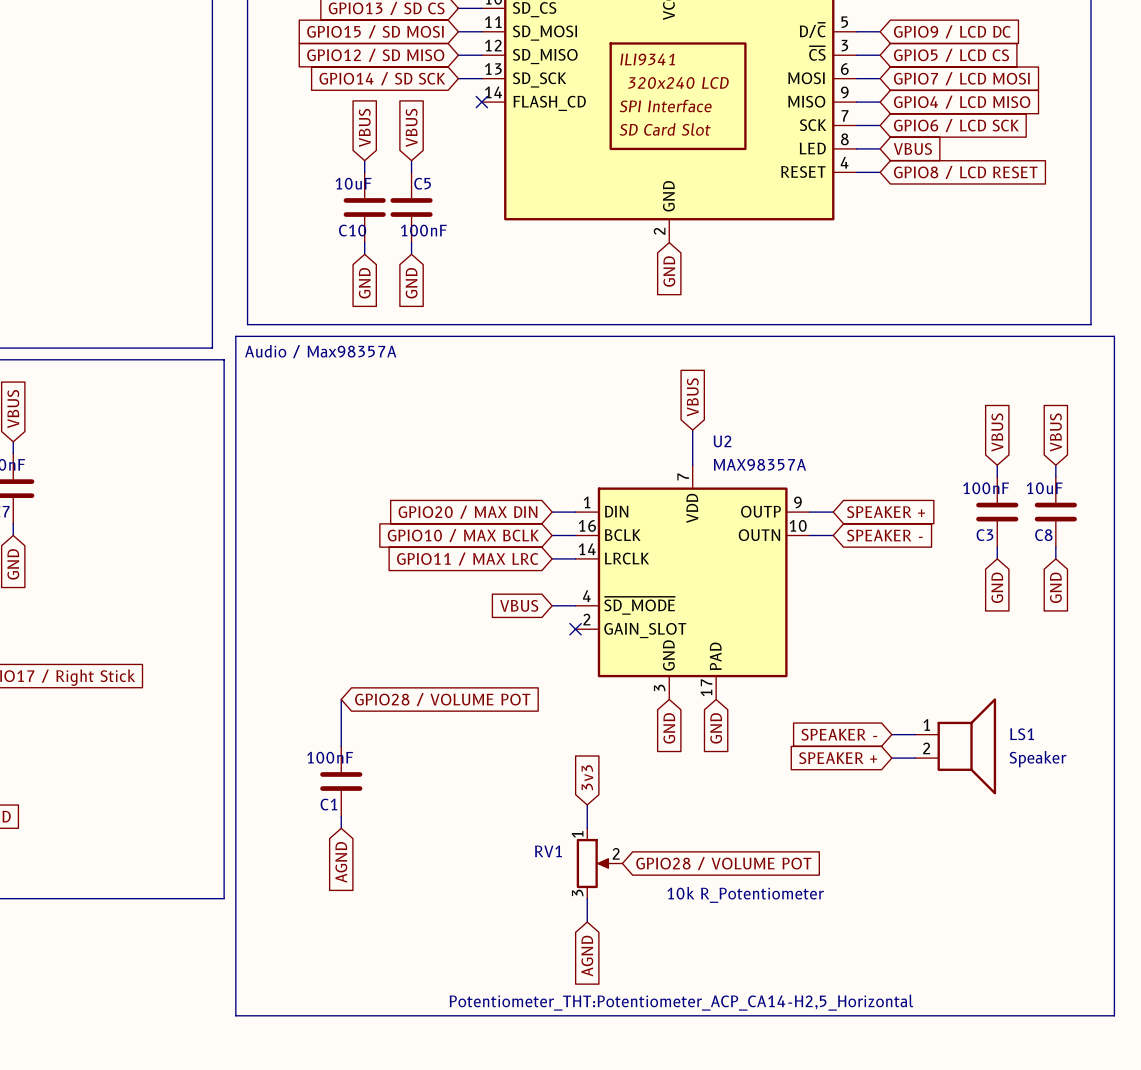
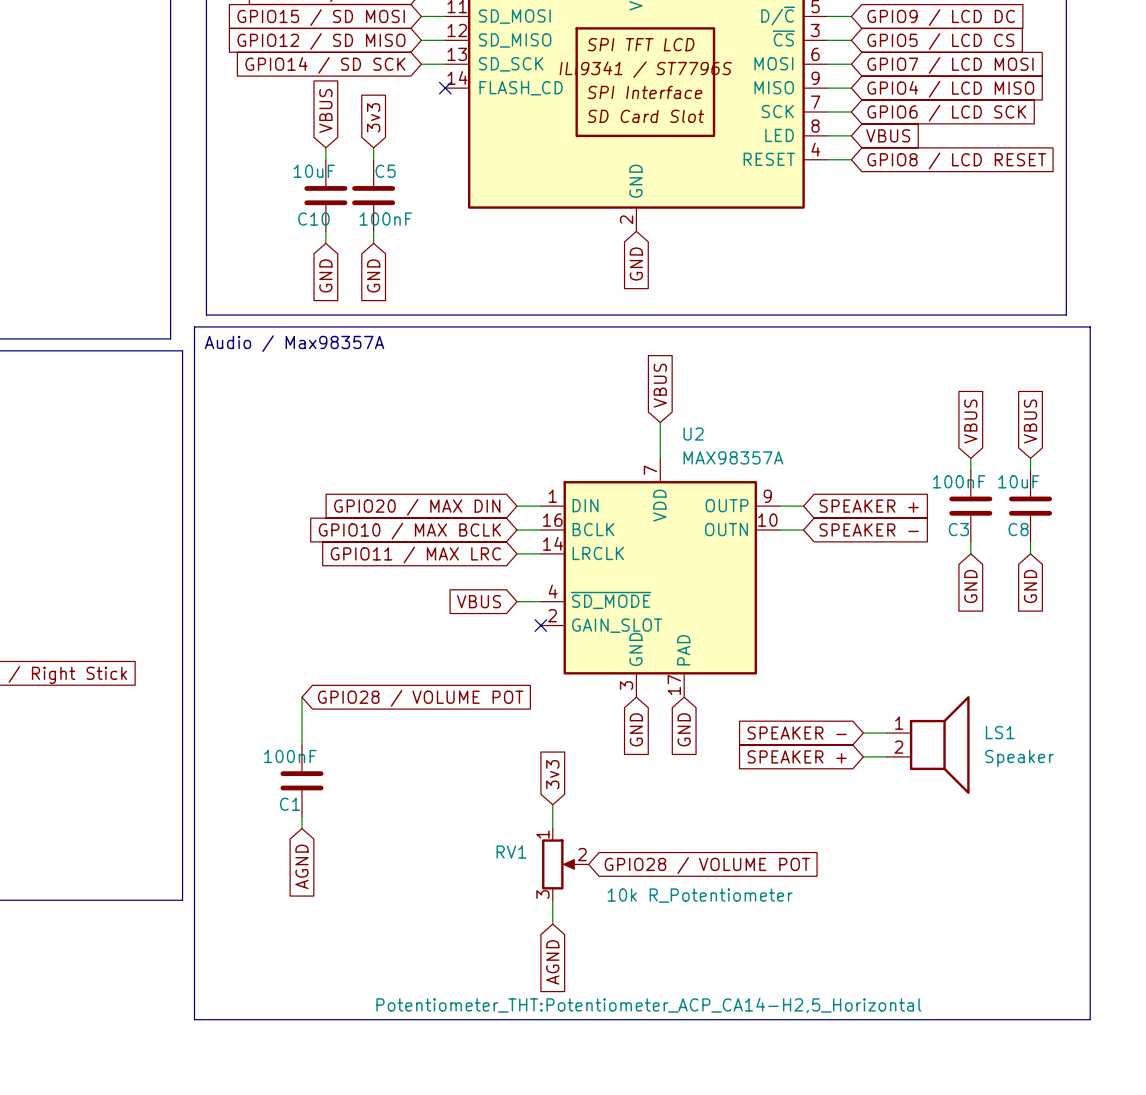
part text: ILI9341 (647, 59) -> SPI TFT LCD (641, 44)
part text: 320x240 LCD (678, 82) -> ILI9341 / ST7796S (645, 69)
global label: VBUS (411, 127) -> 3v3 (373, 117)

